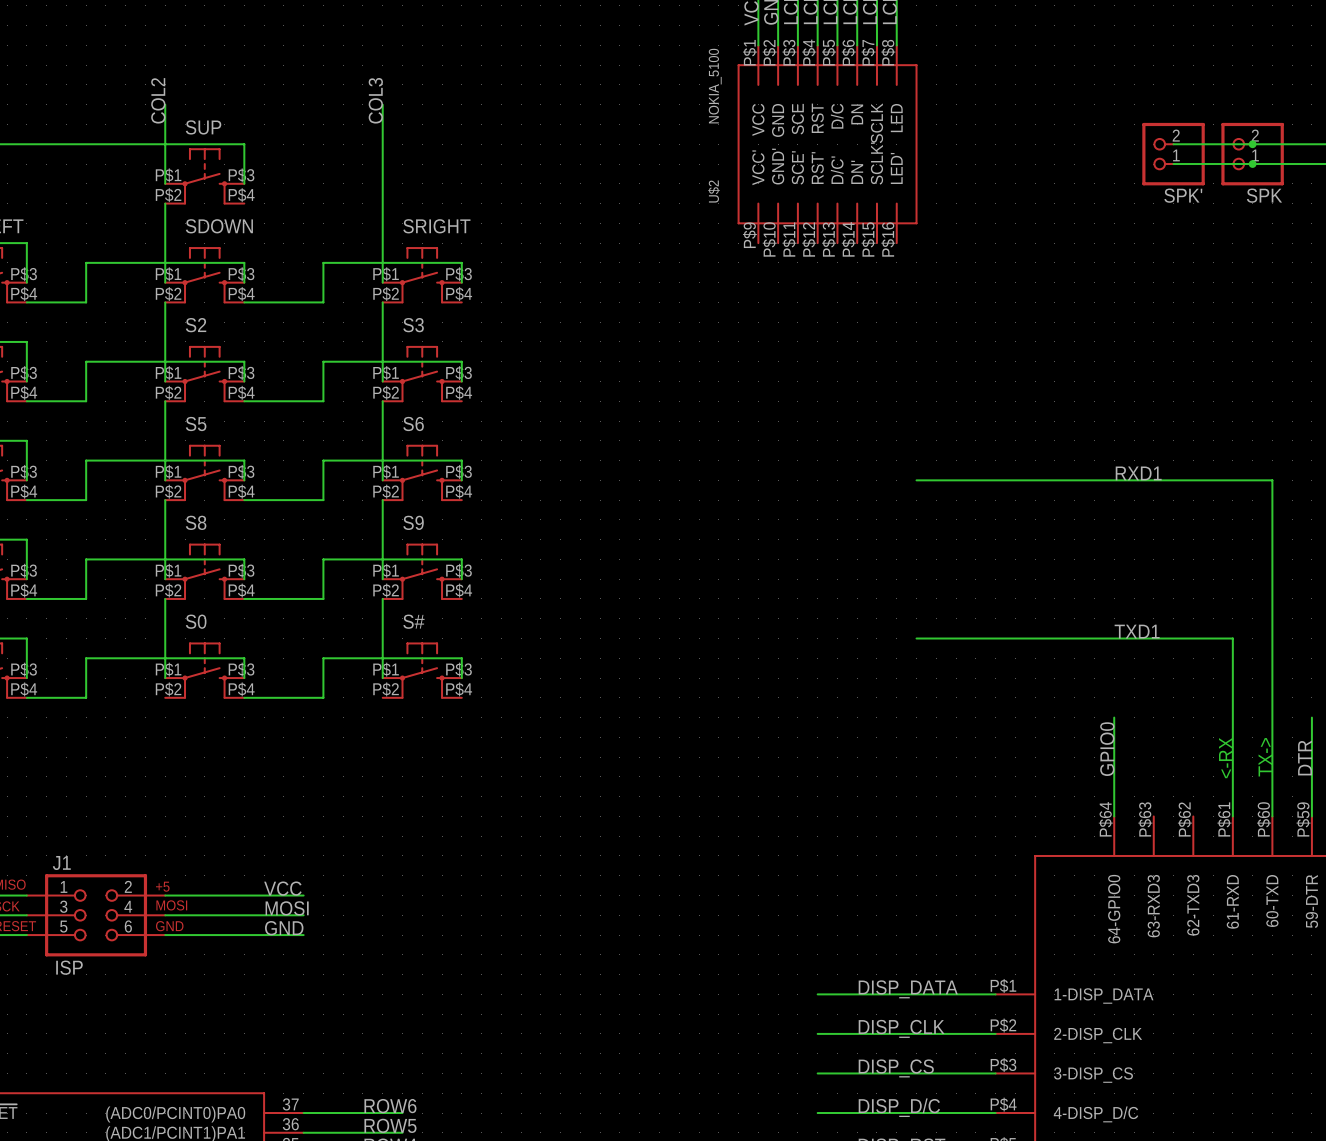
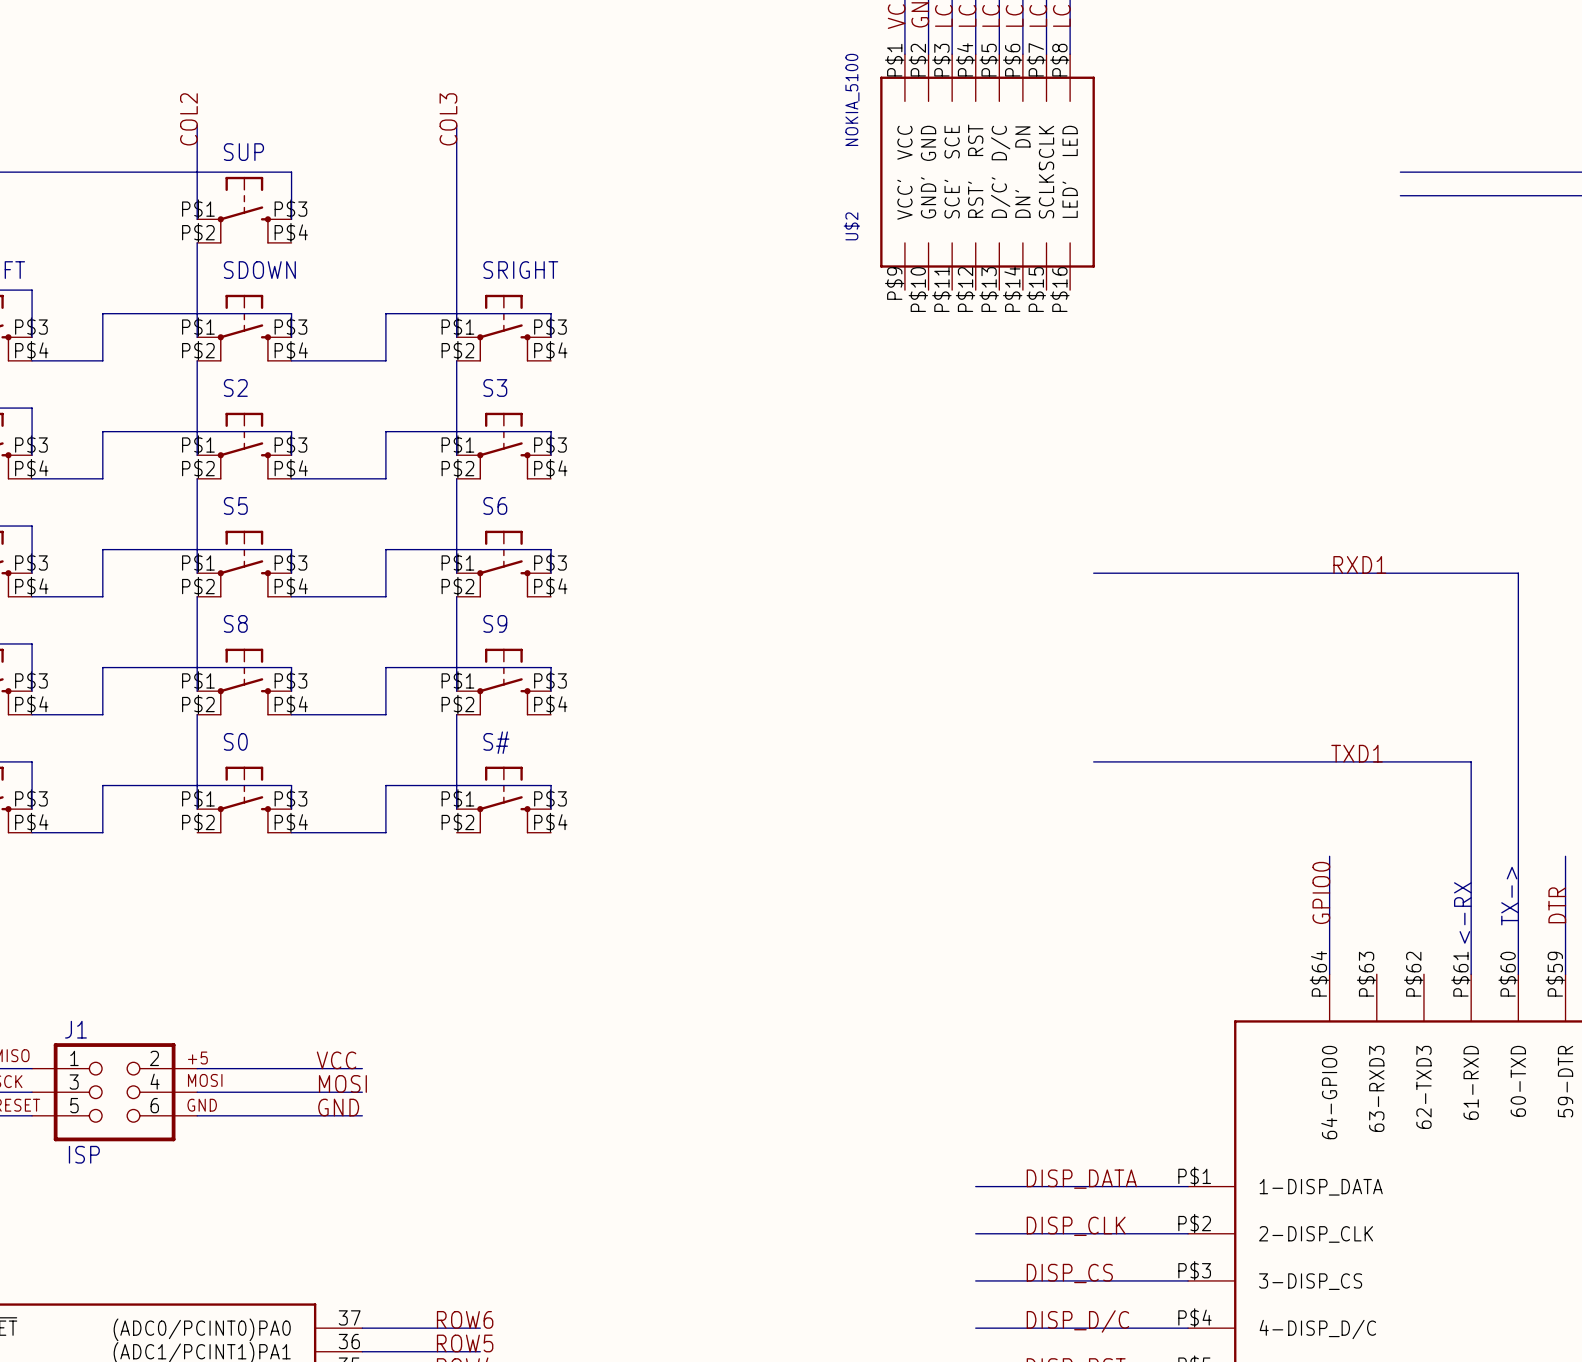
junction: (1252, 144) -> none
SPK': (1173, 154) -> none
SPK: (1252, 154) -> none
junction: (1252, 164) -> none

